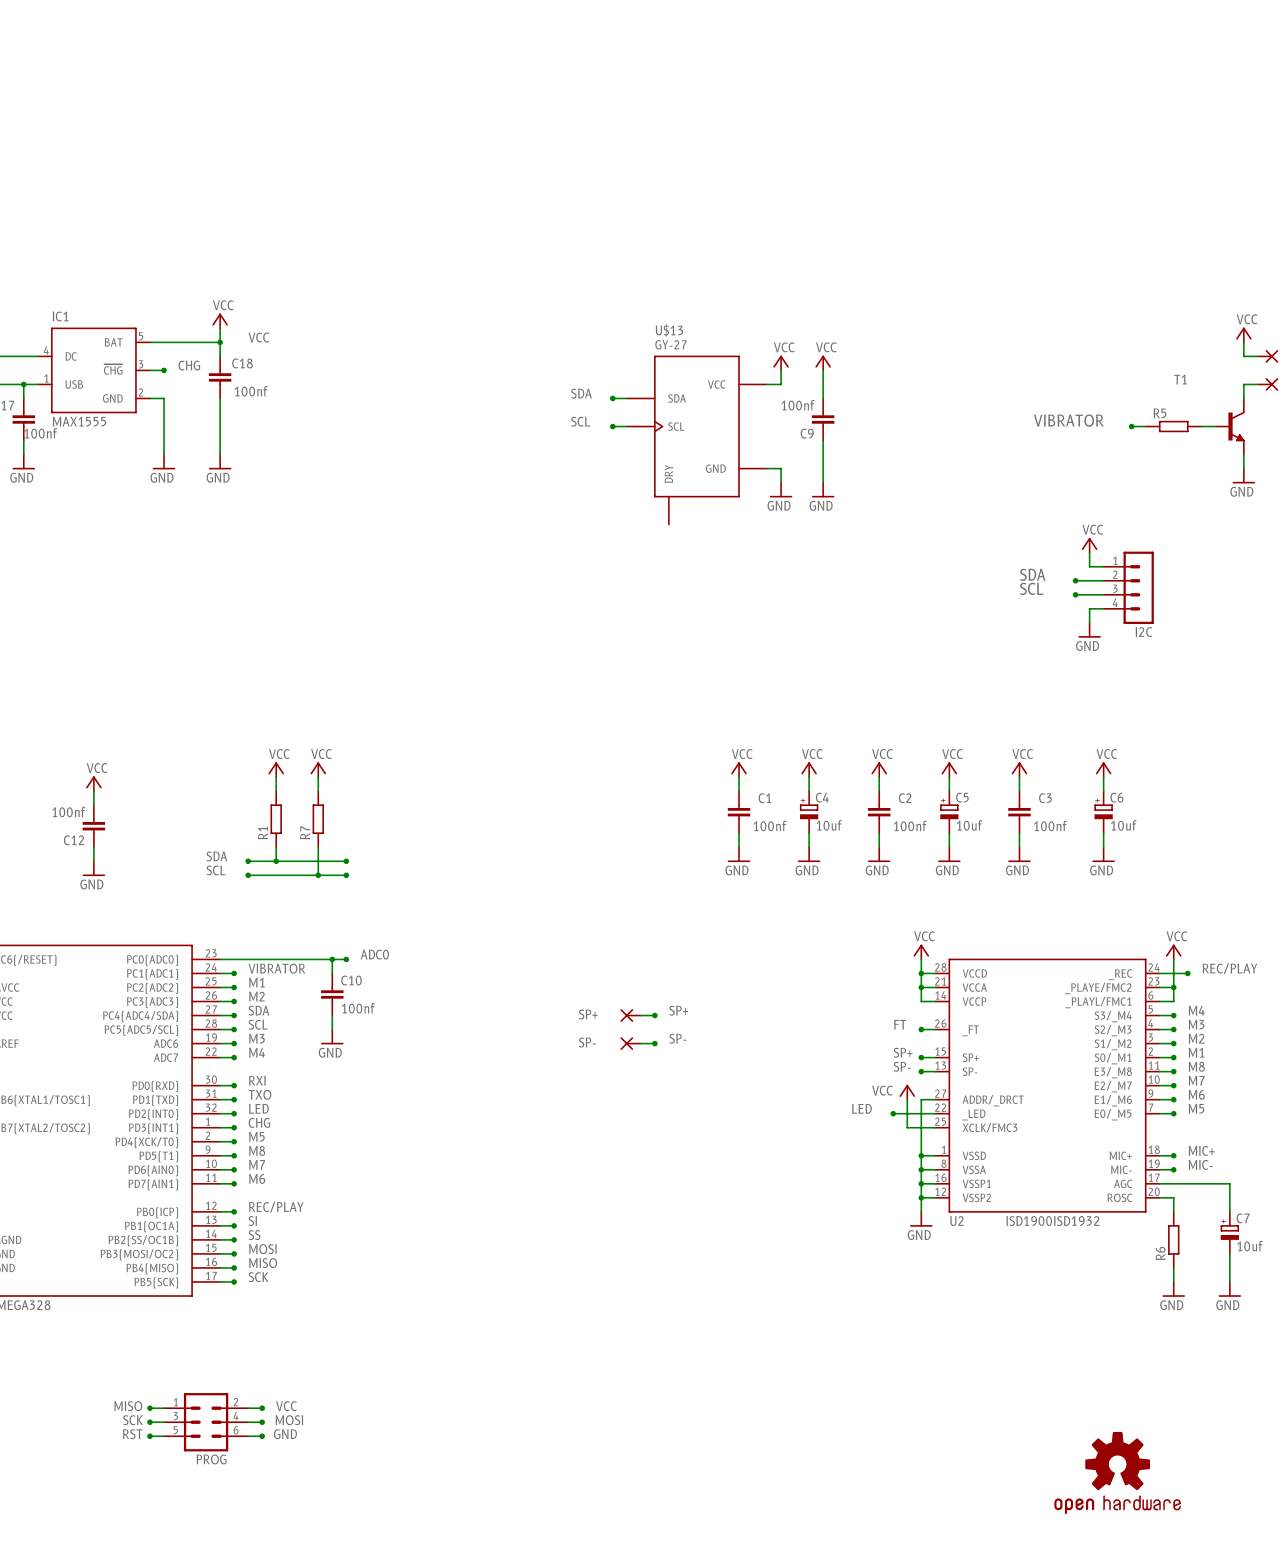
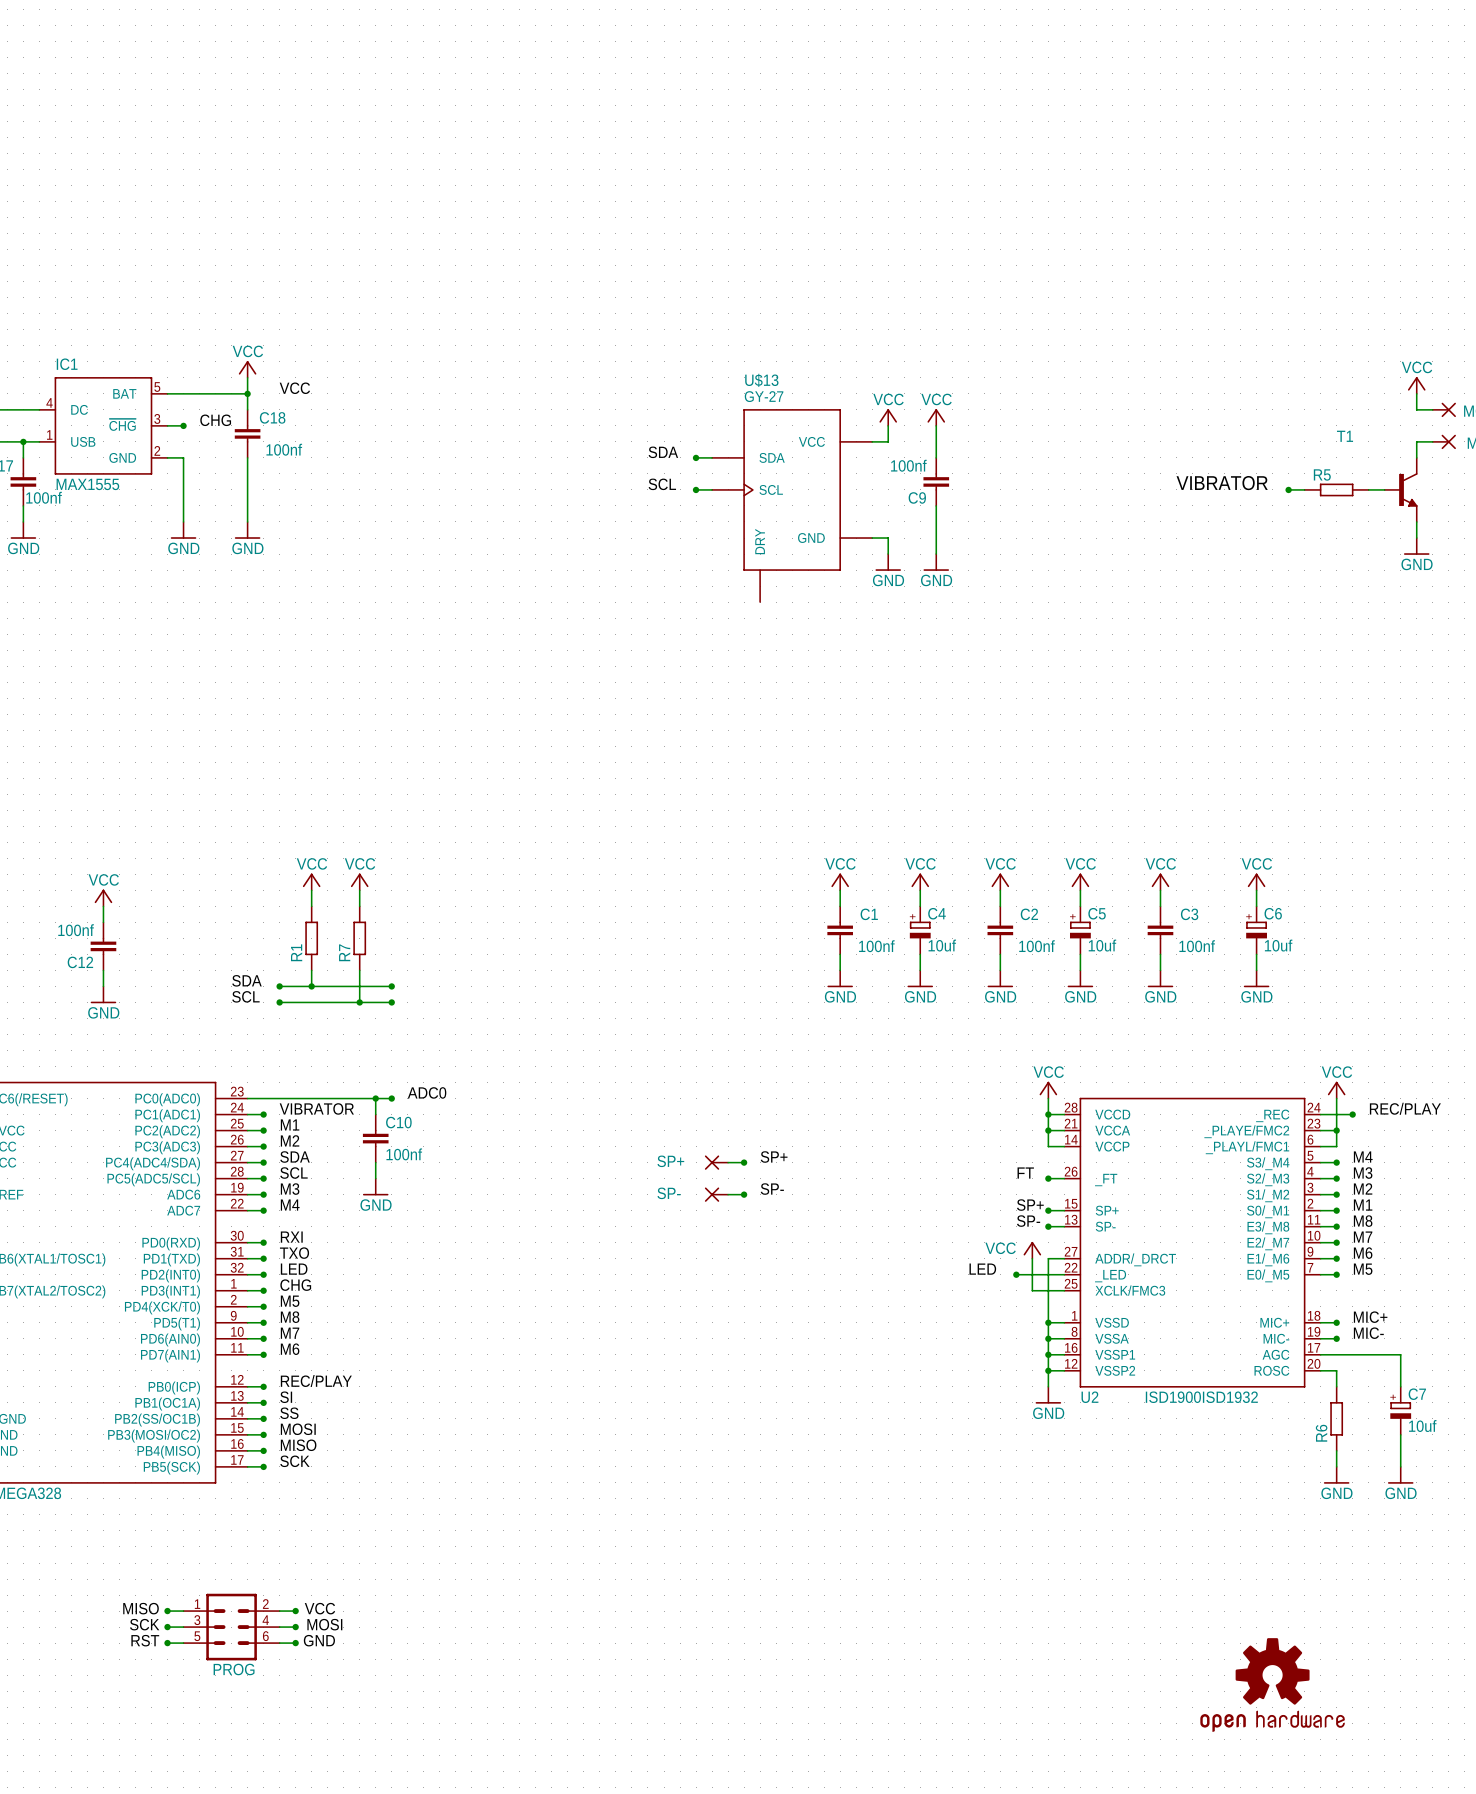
power symbol: VCC (1089, 545) -> none
wire: (1089, 552) (1089, 566) (1103, 566) -> none
label: SDA (1032, 574) -> none
wire: (1075, 580) (1103, 580) -> none
junction: (1075, 580) -> none
I2C: (1128, 587) -> none
label: SCL (1031, 588) -> none
wire: (1075, 594) (1103, 594) -> none
junction: (1075, 594) -> none
wire: (1103, 608) (1089, 608) (1089, 622) -> none
power symbol: GND (1089, 630) -> none

